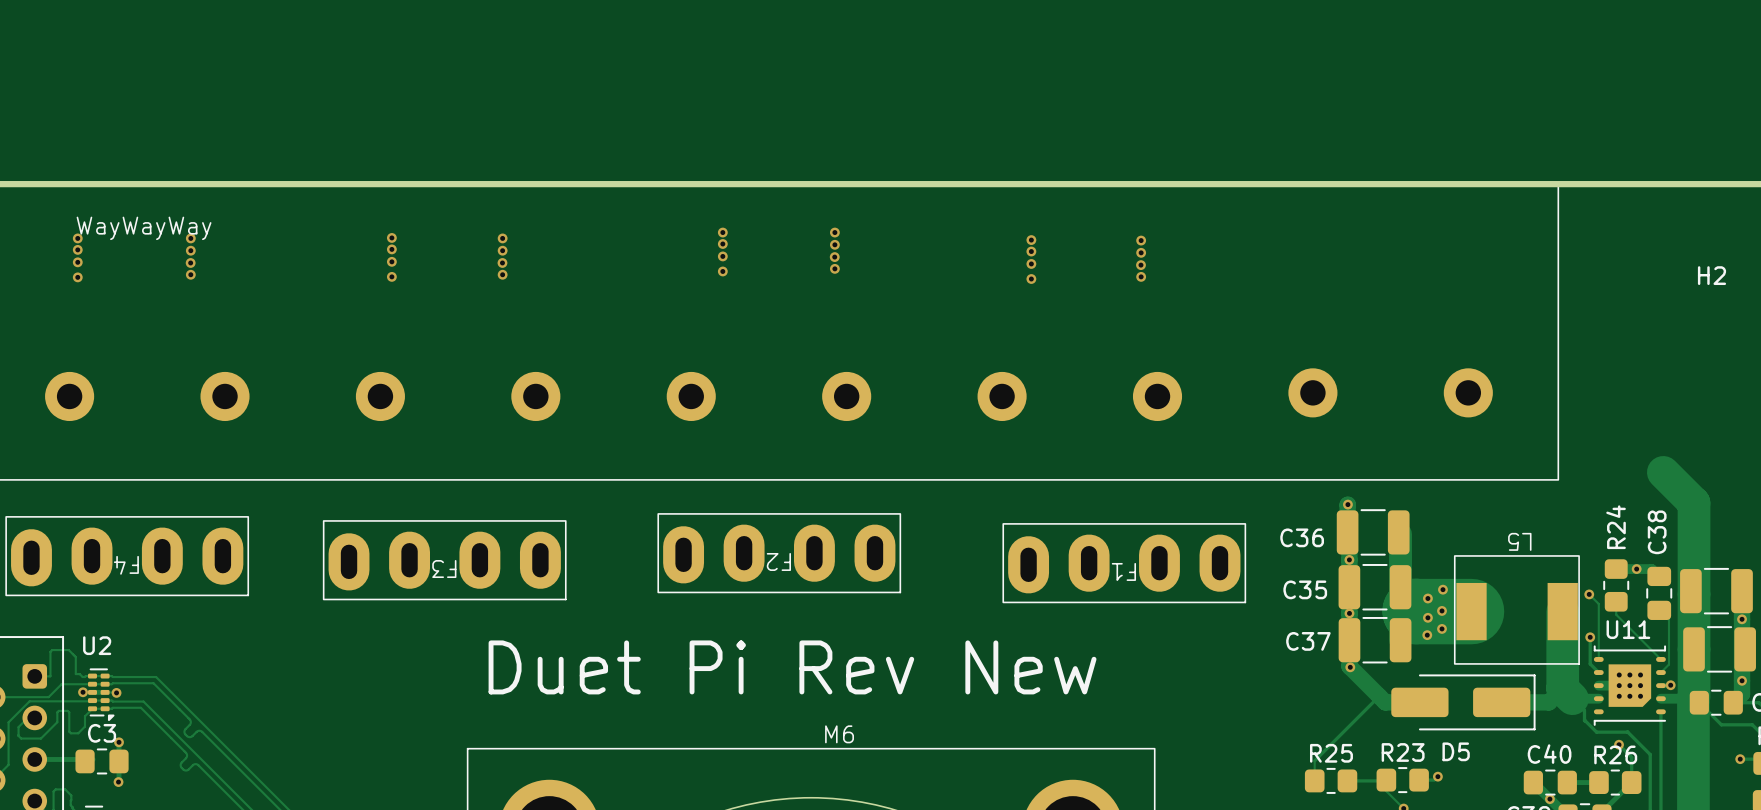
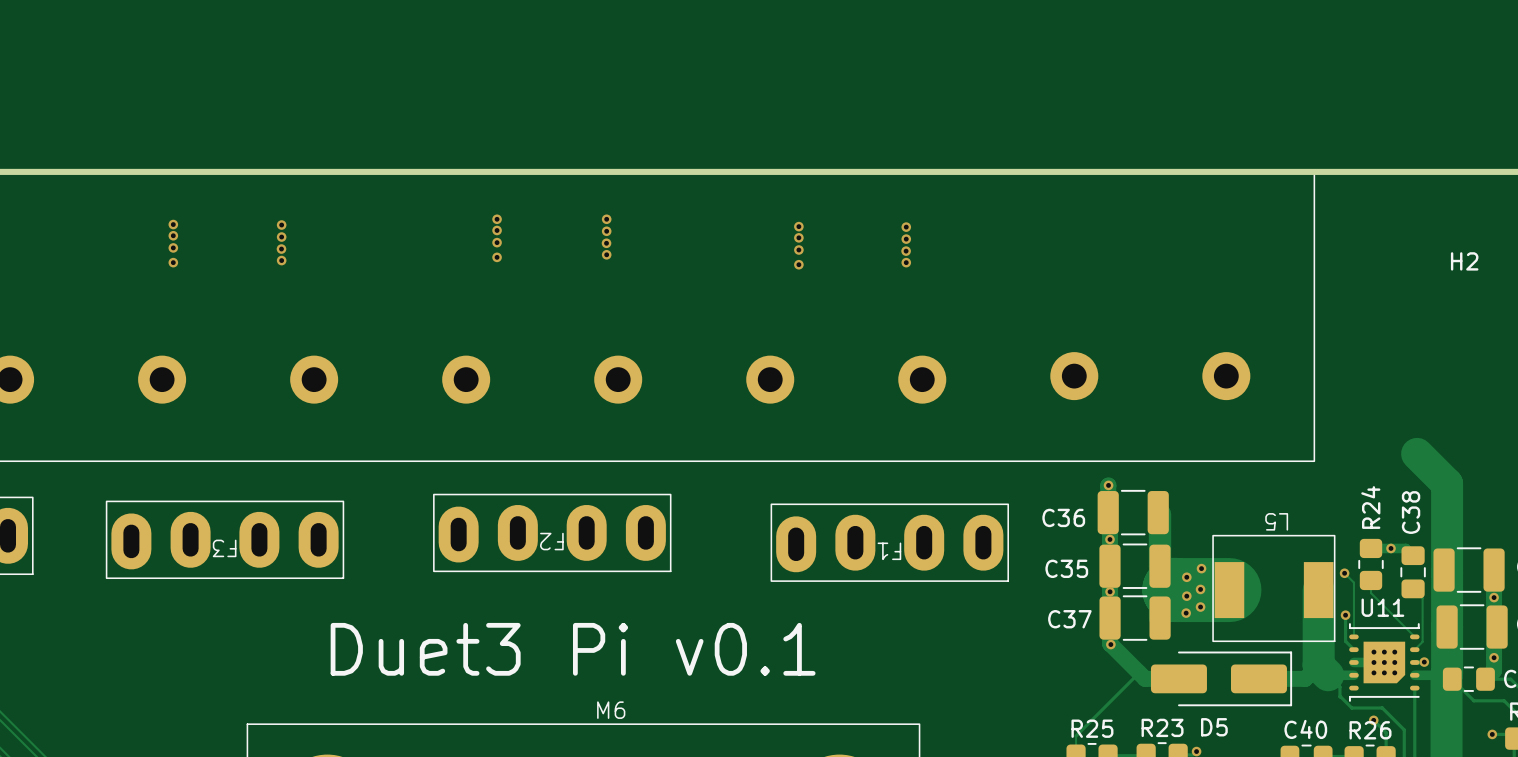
text: Duet Pi Rev New (792, 667) -> Duet3 Pi v0.1 (573, 649)

